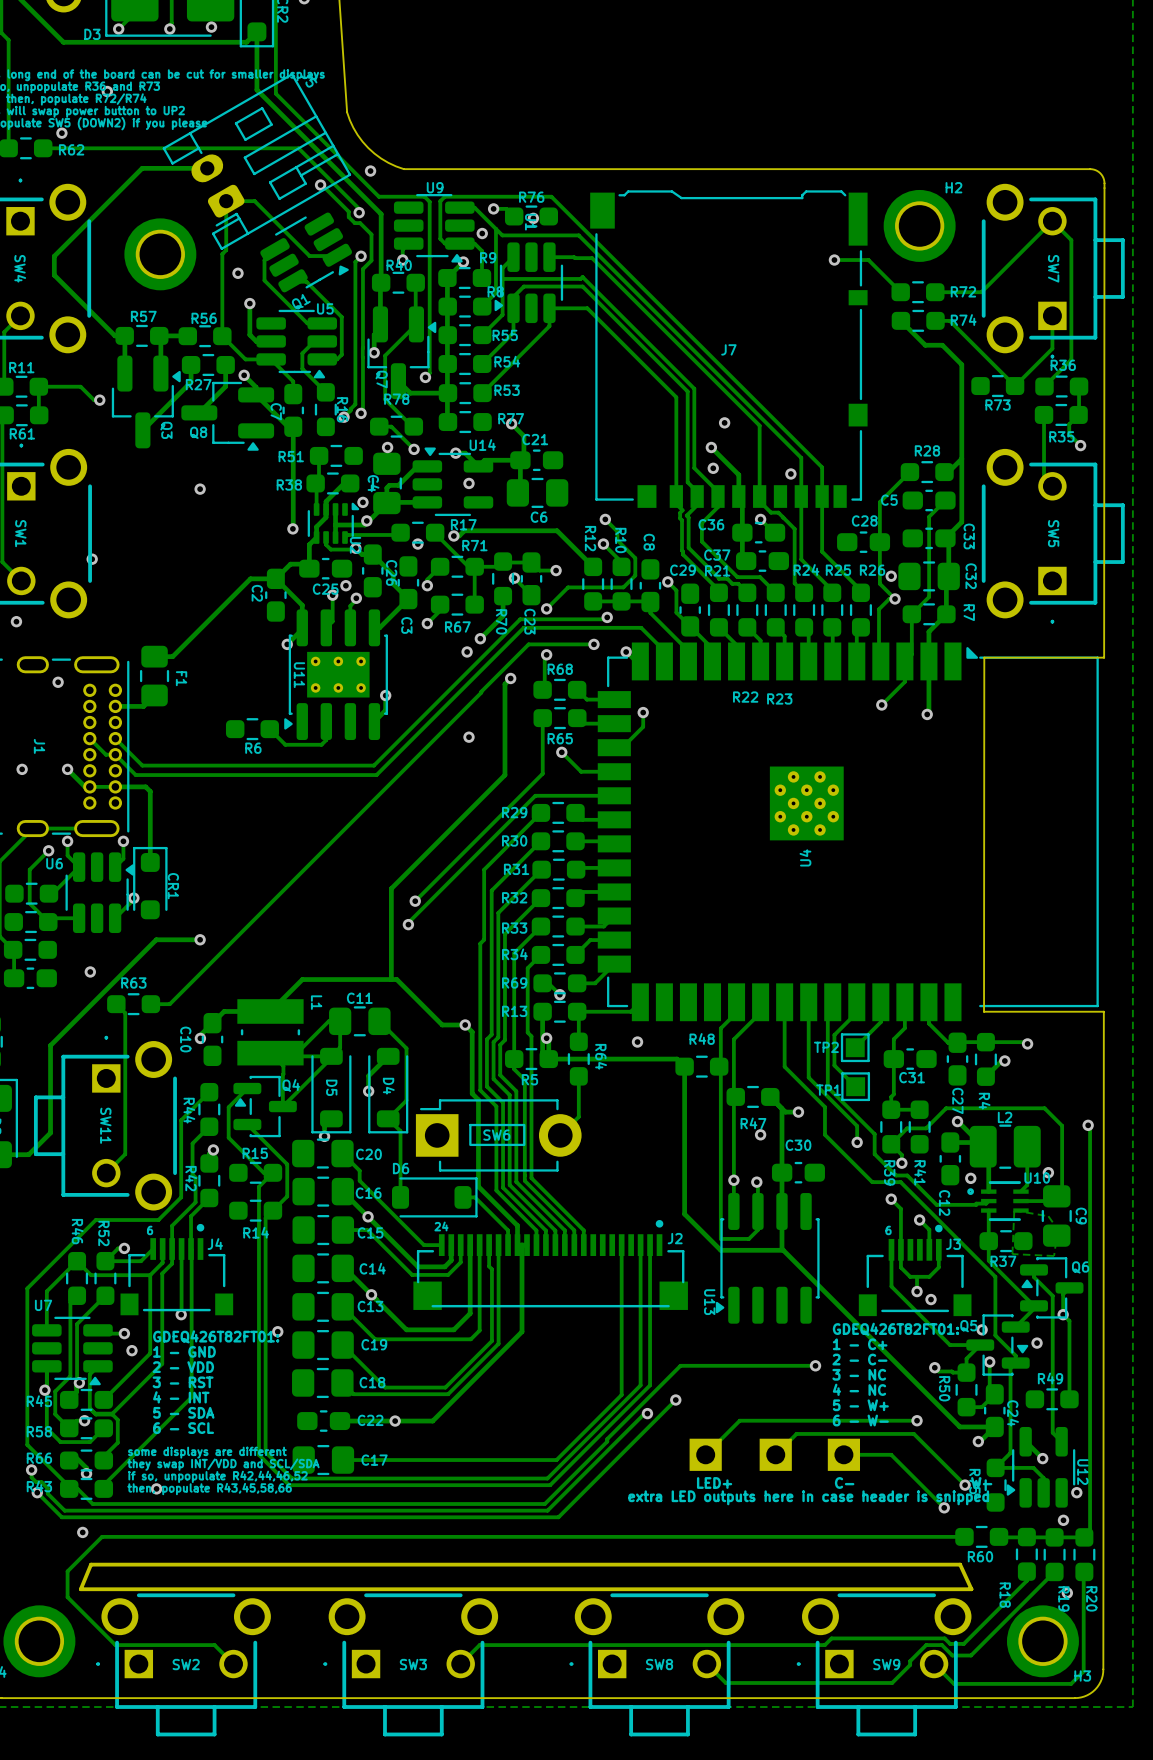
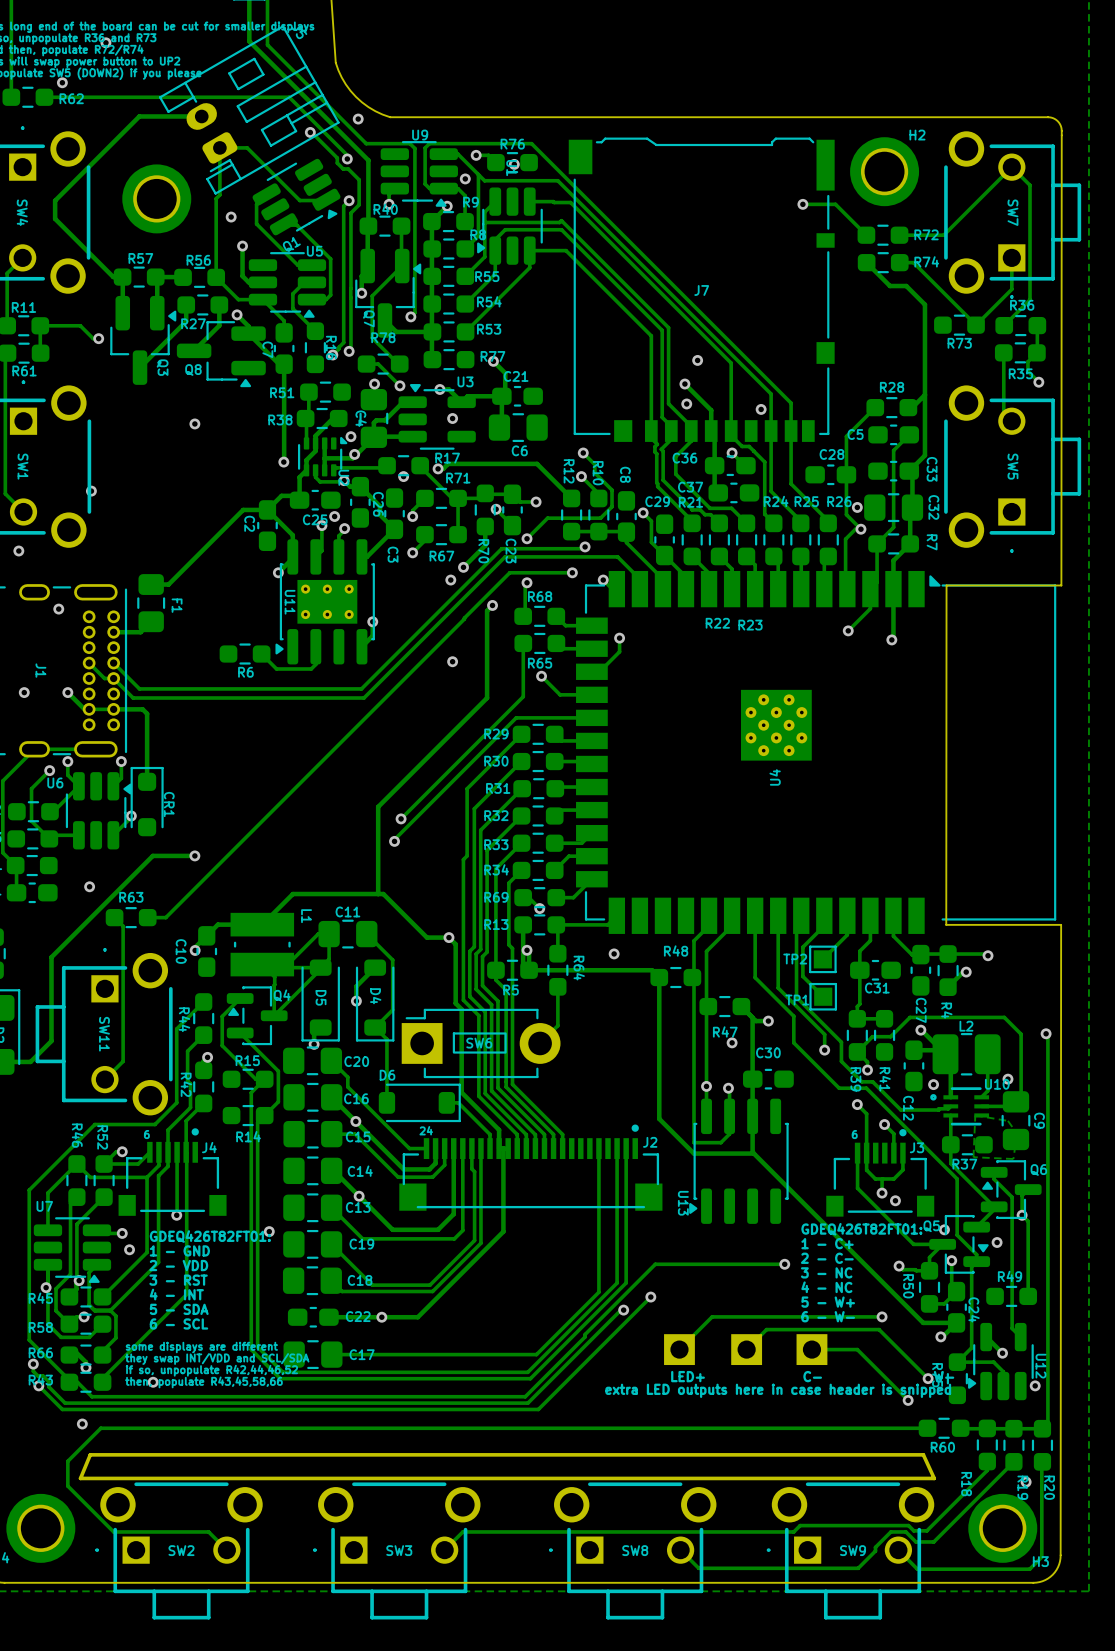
U14 name: U14 (482, 445) -> U3 (465, 381)
via: (1063, 1520) -> none

